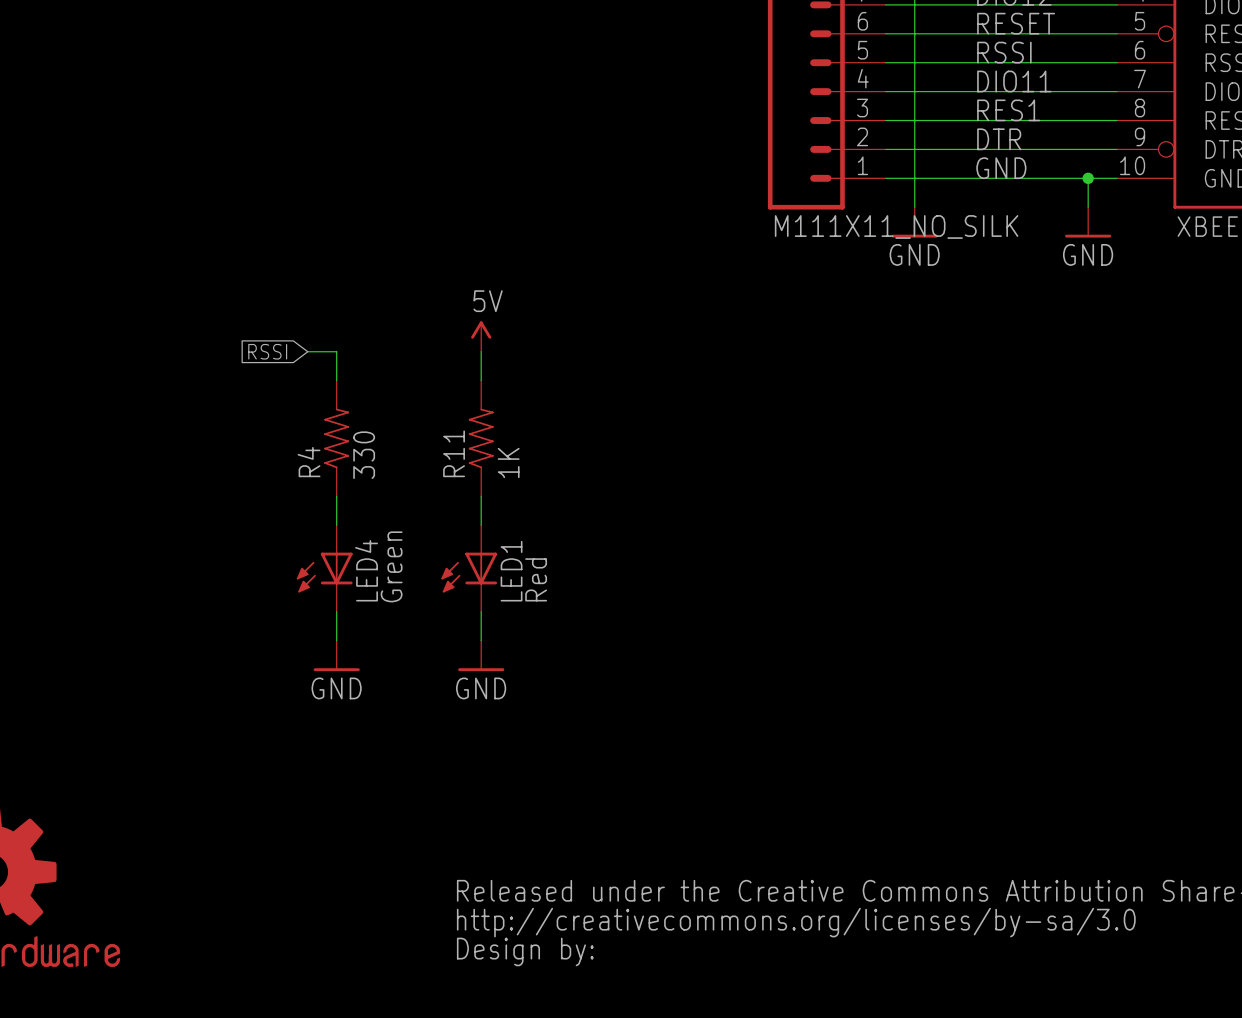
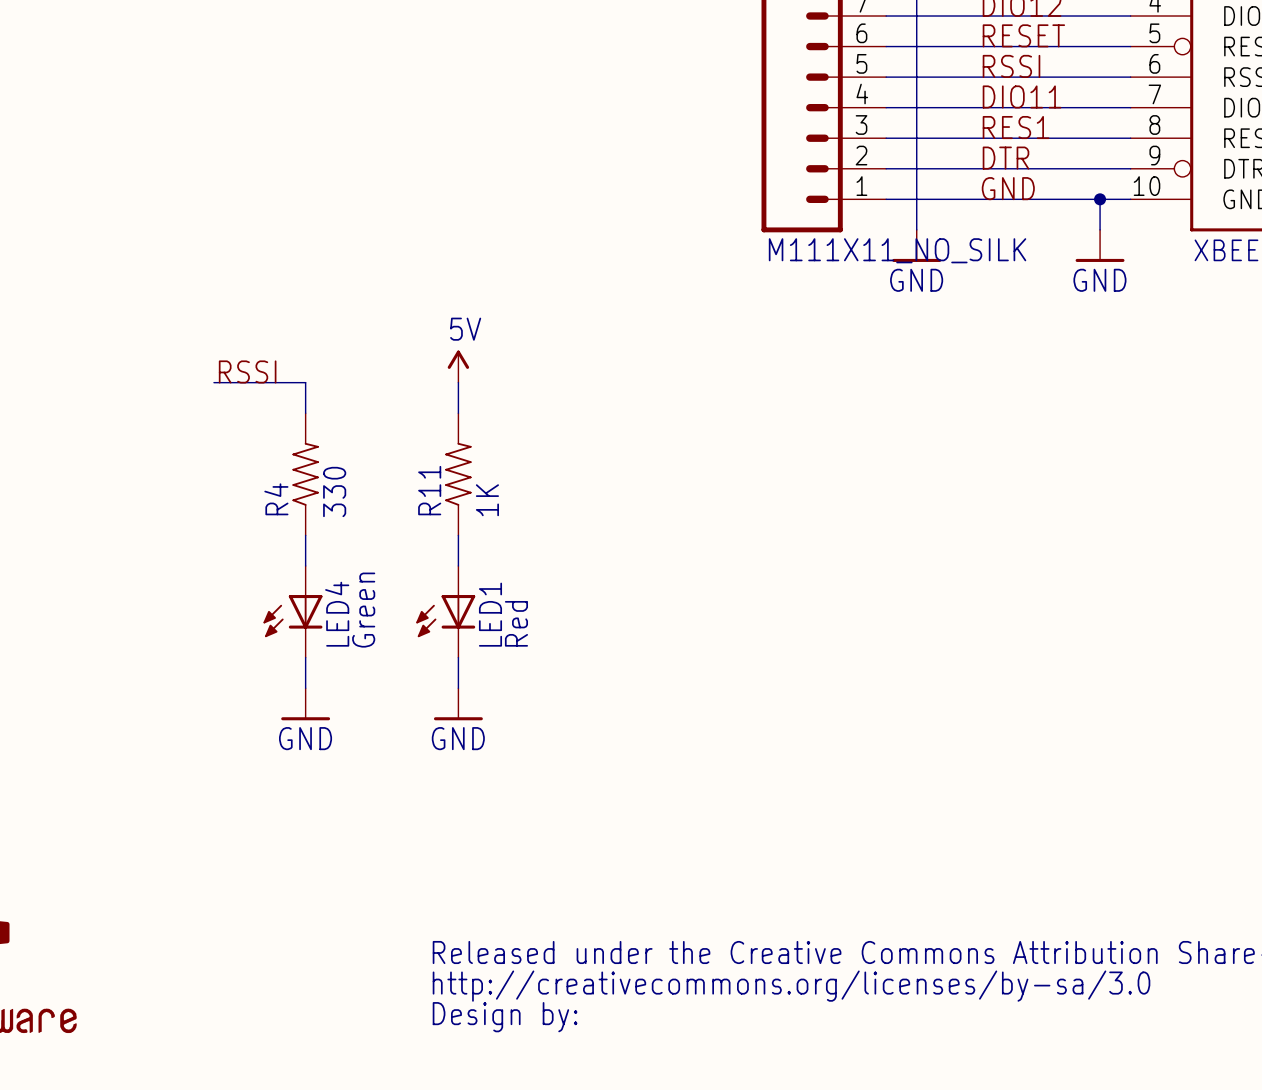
label: none -> RSSI (247, 371)
wire: none -> (213, 382) (275, 382)
global label: RSSI (267, 351) -> none

